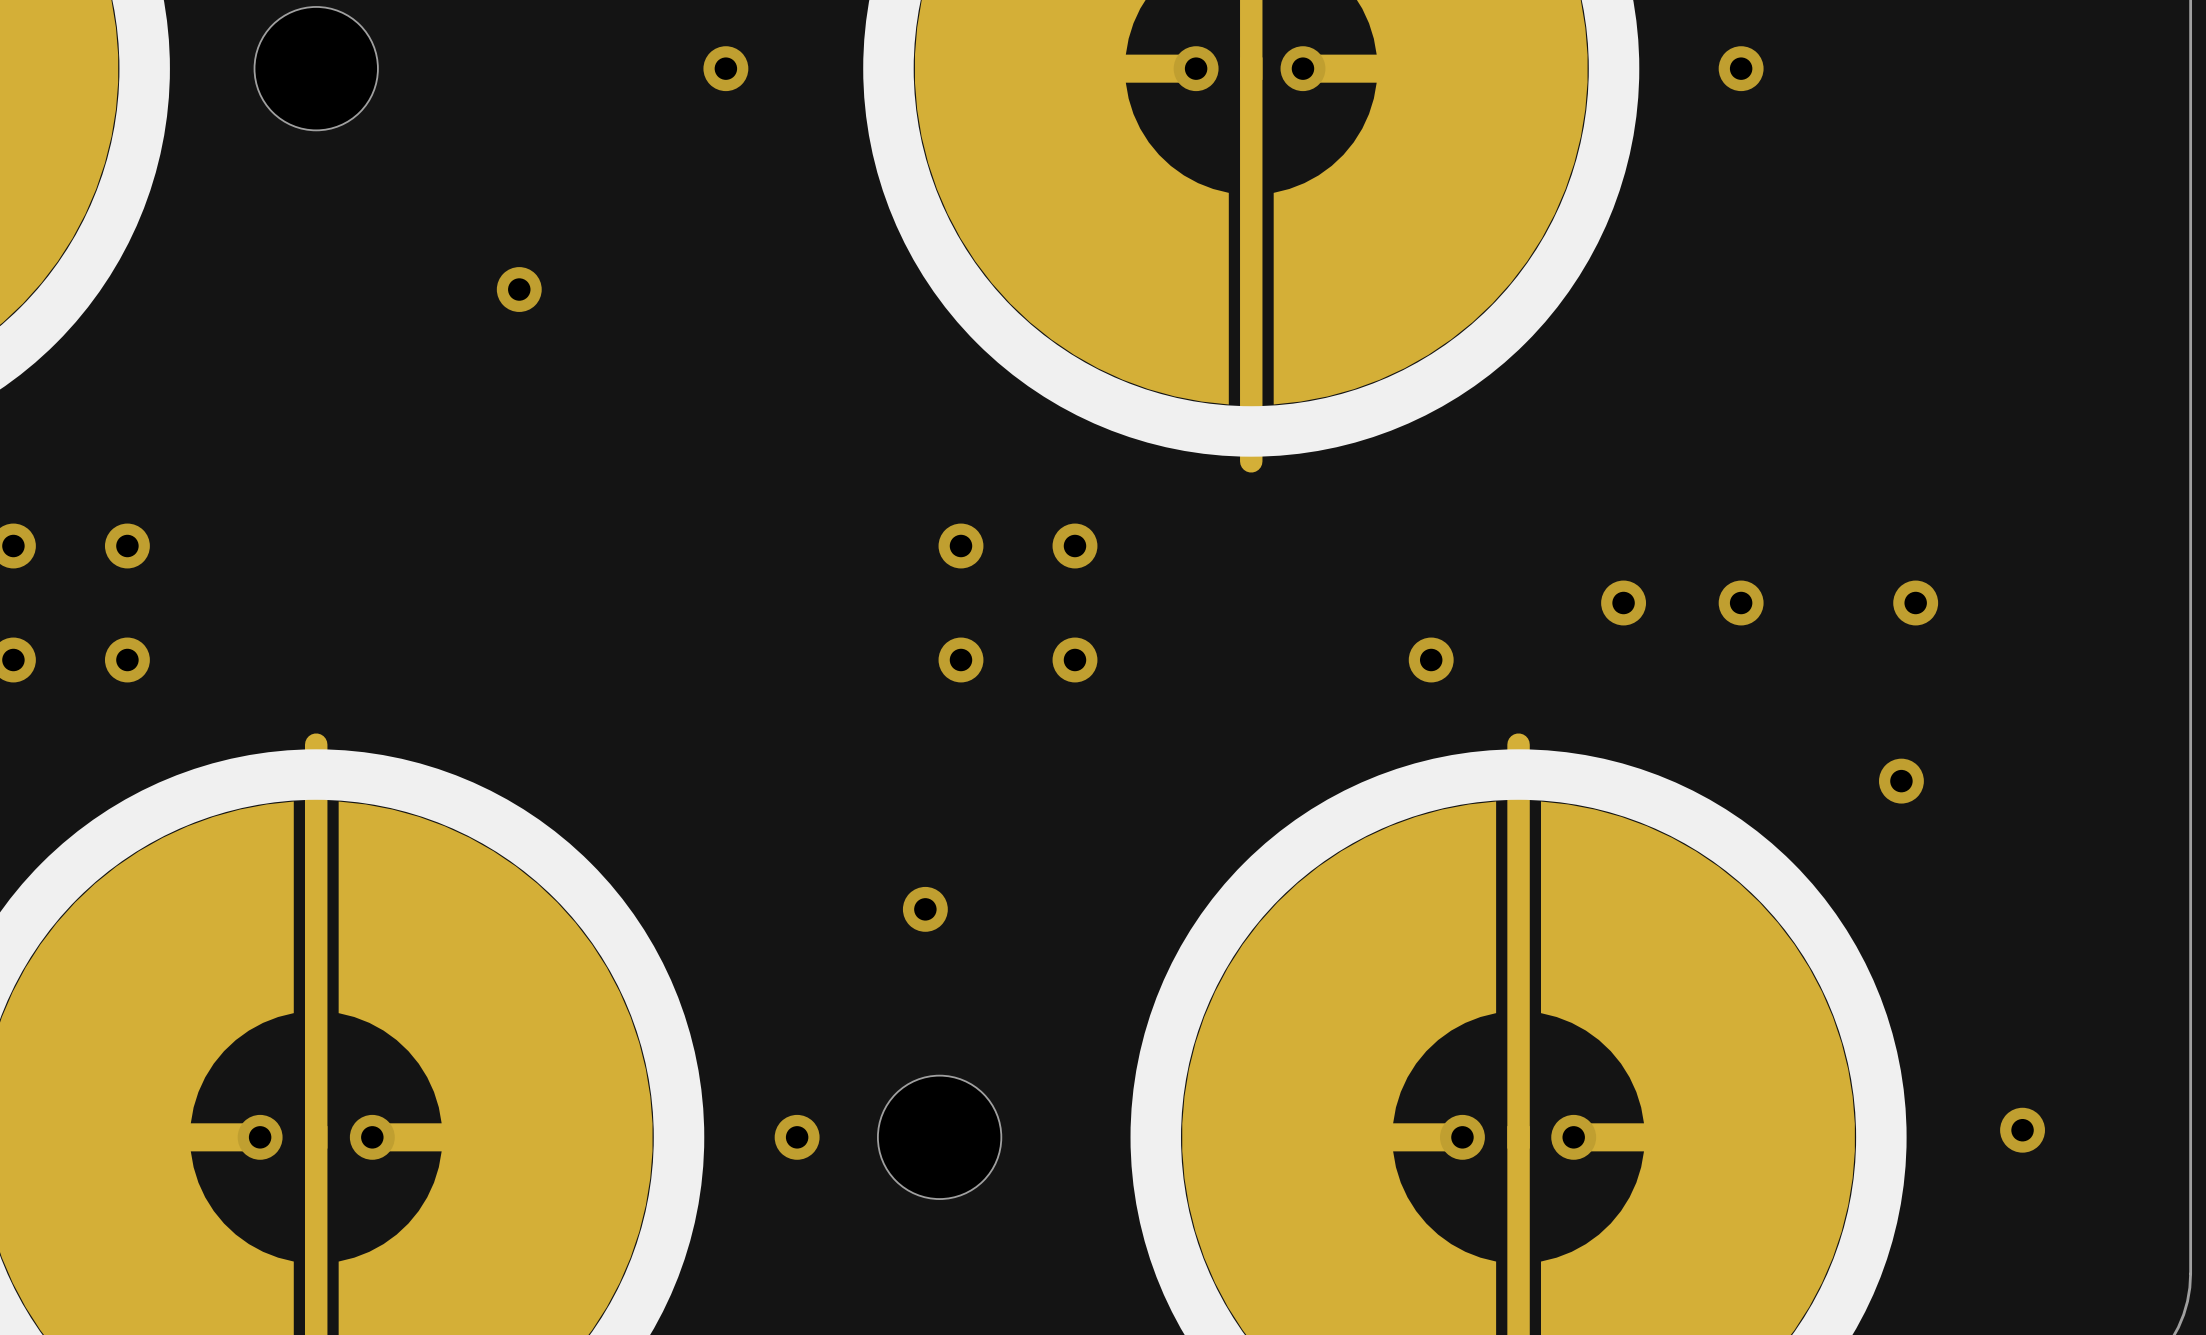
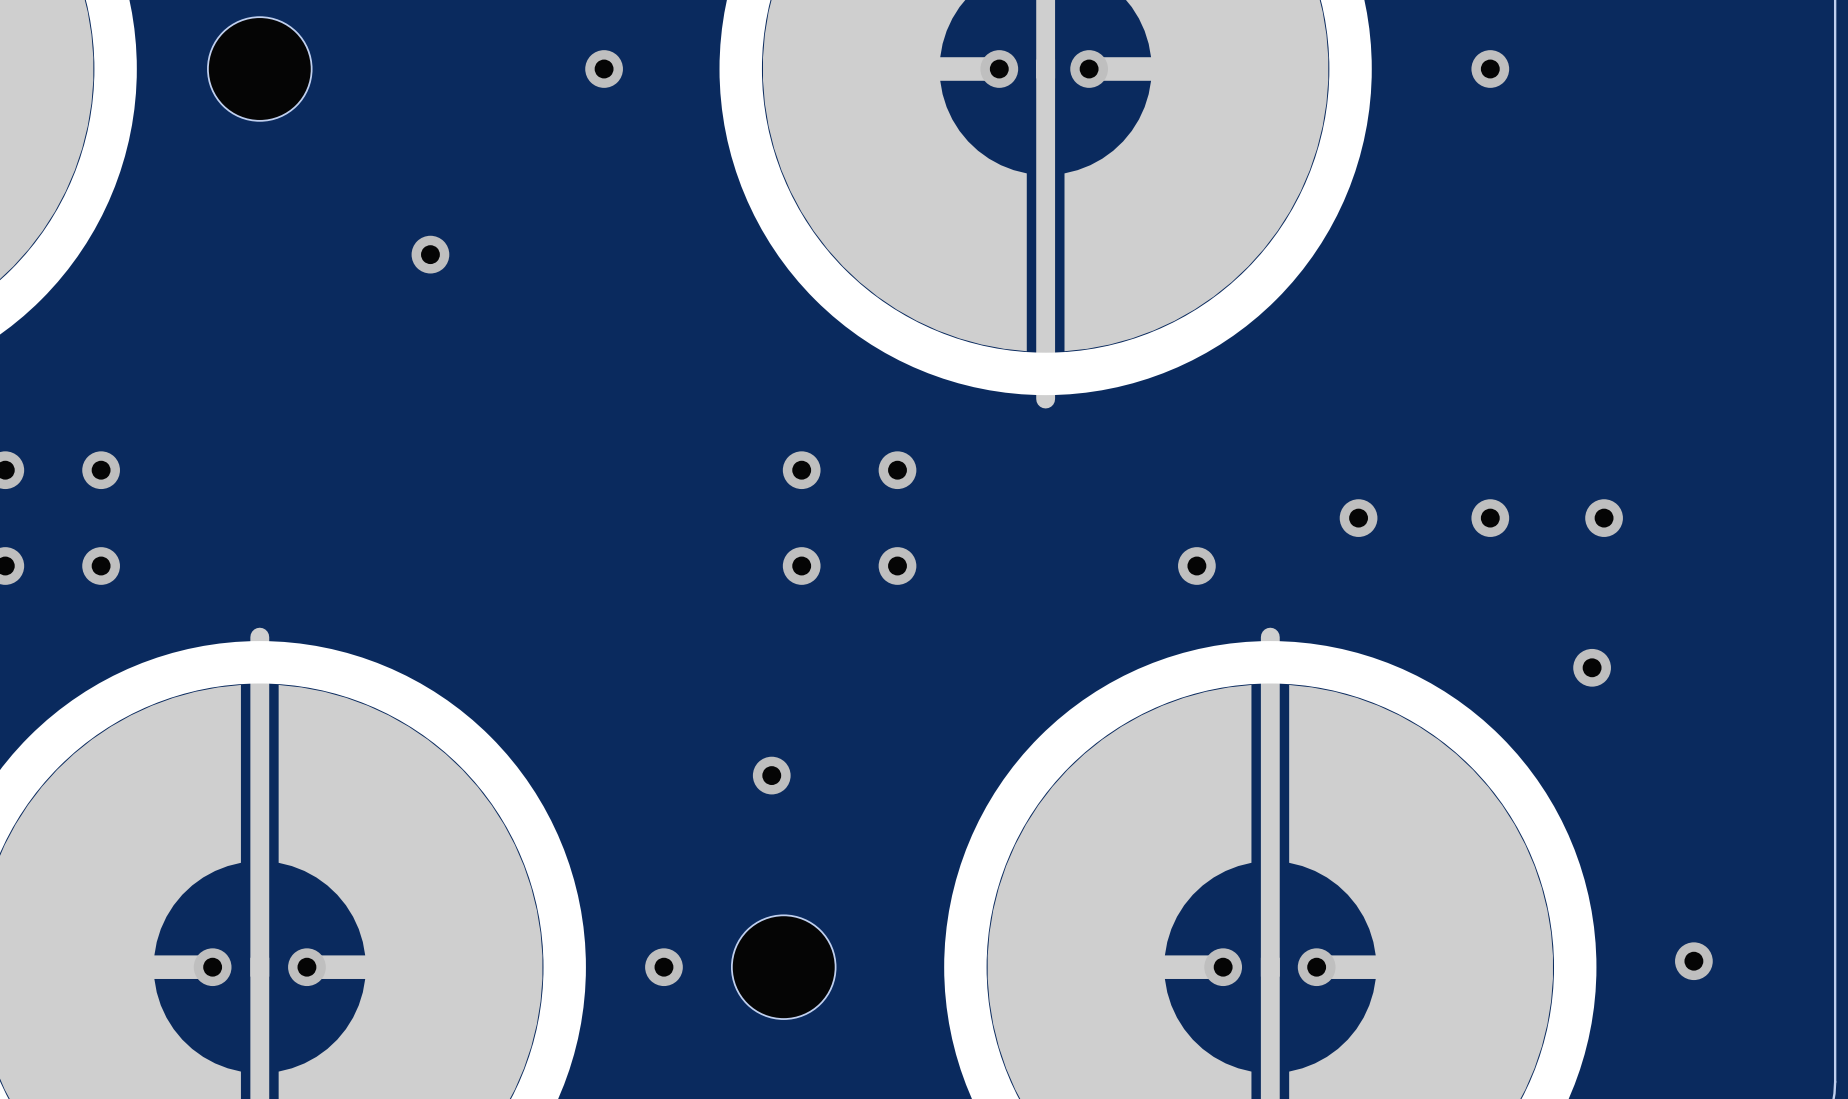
via position: (1741, 68) -> (1490, 69)
via position: (1741, 603) -> (1490, 518)

